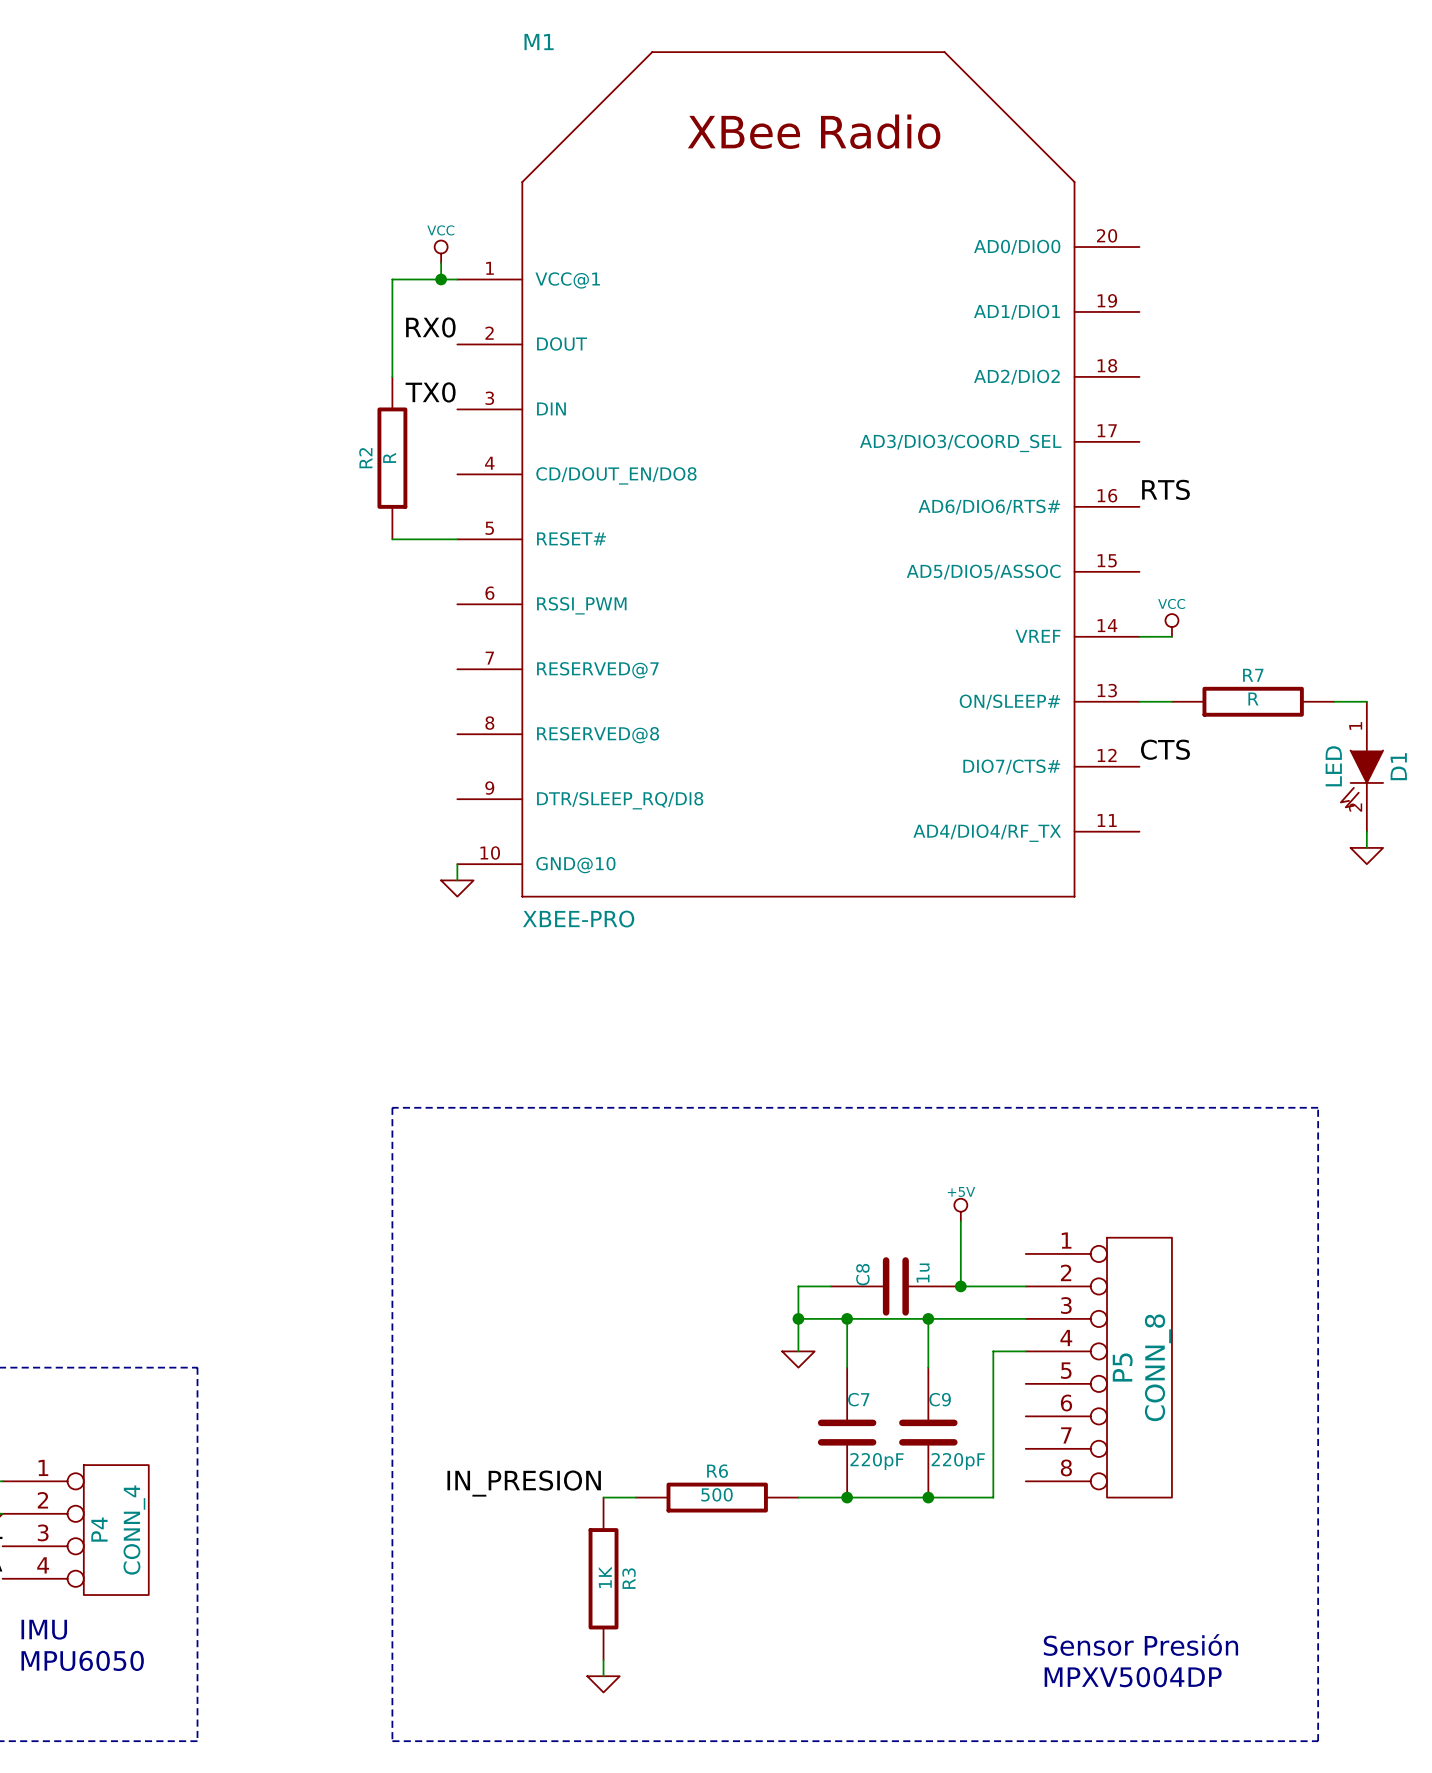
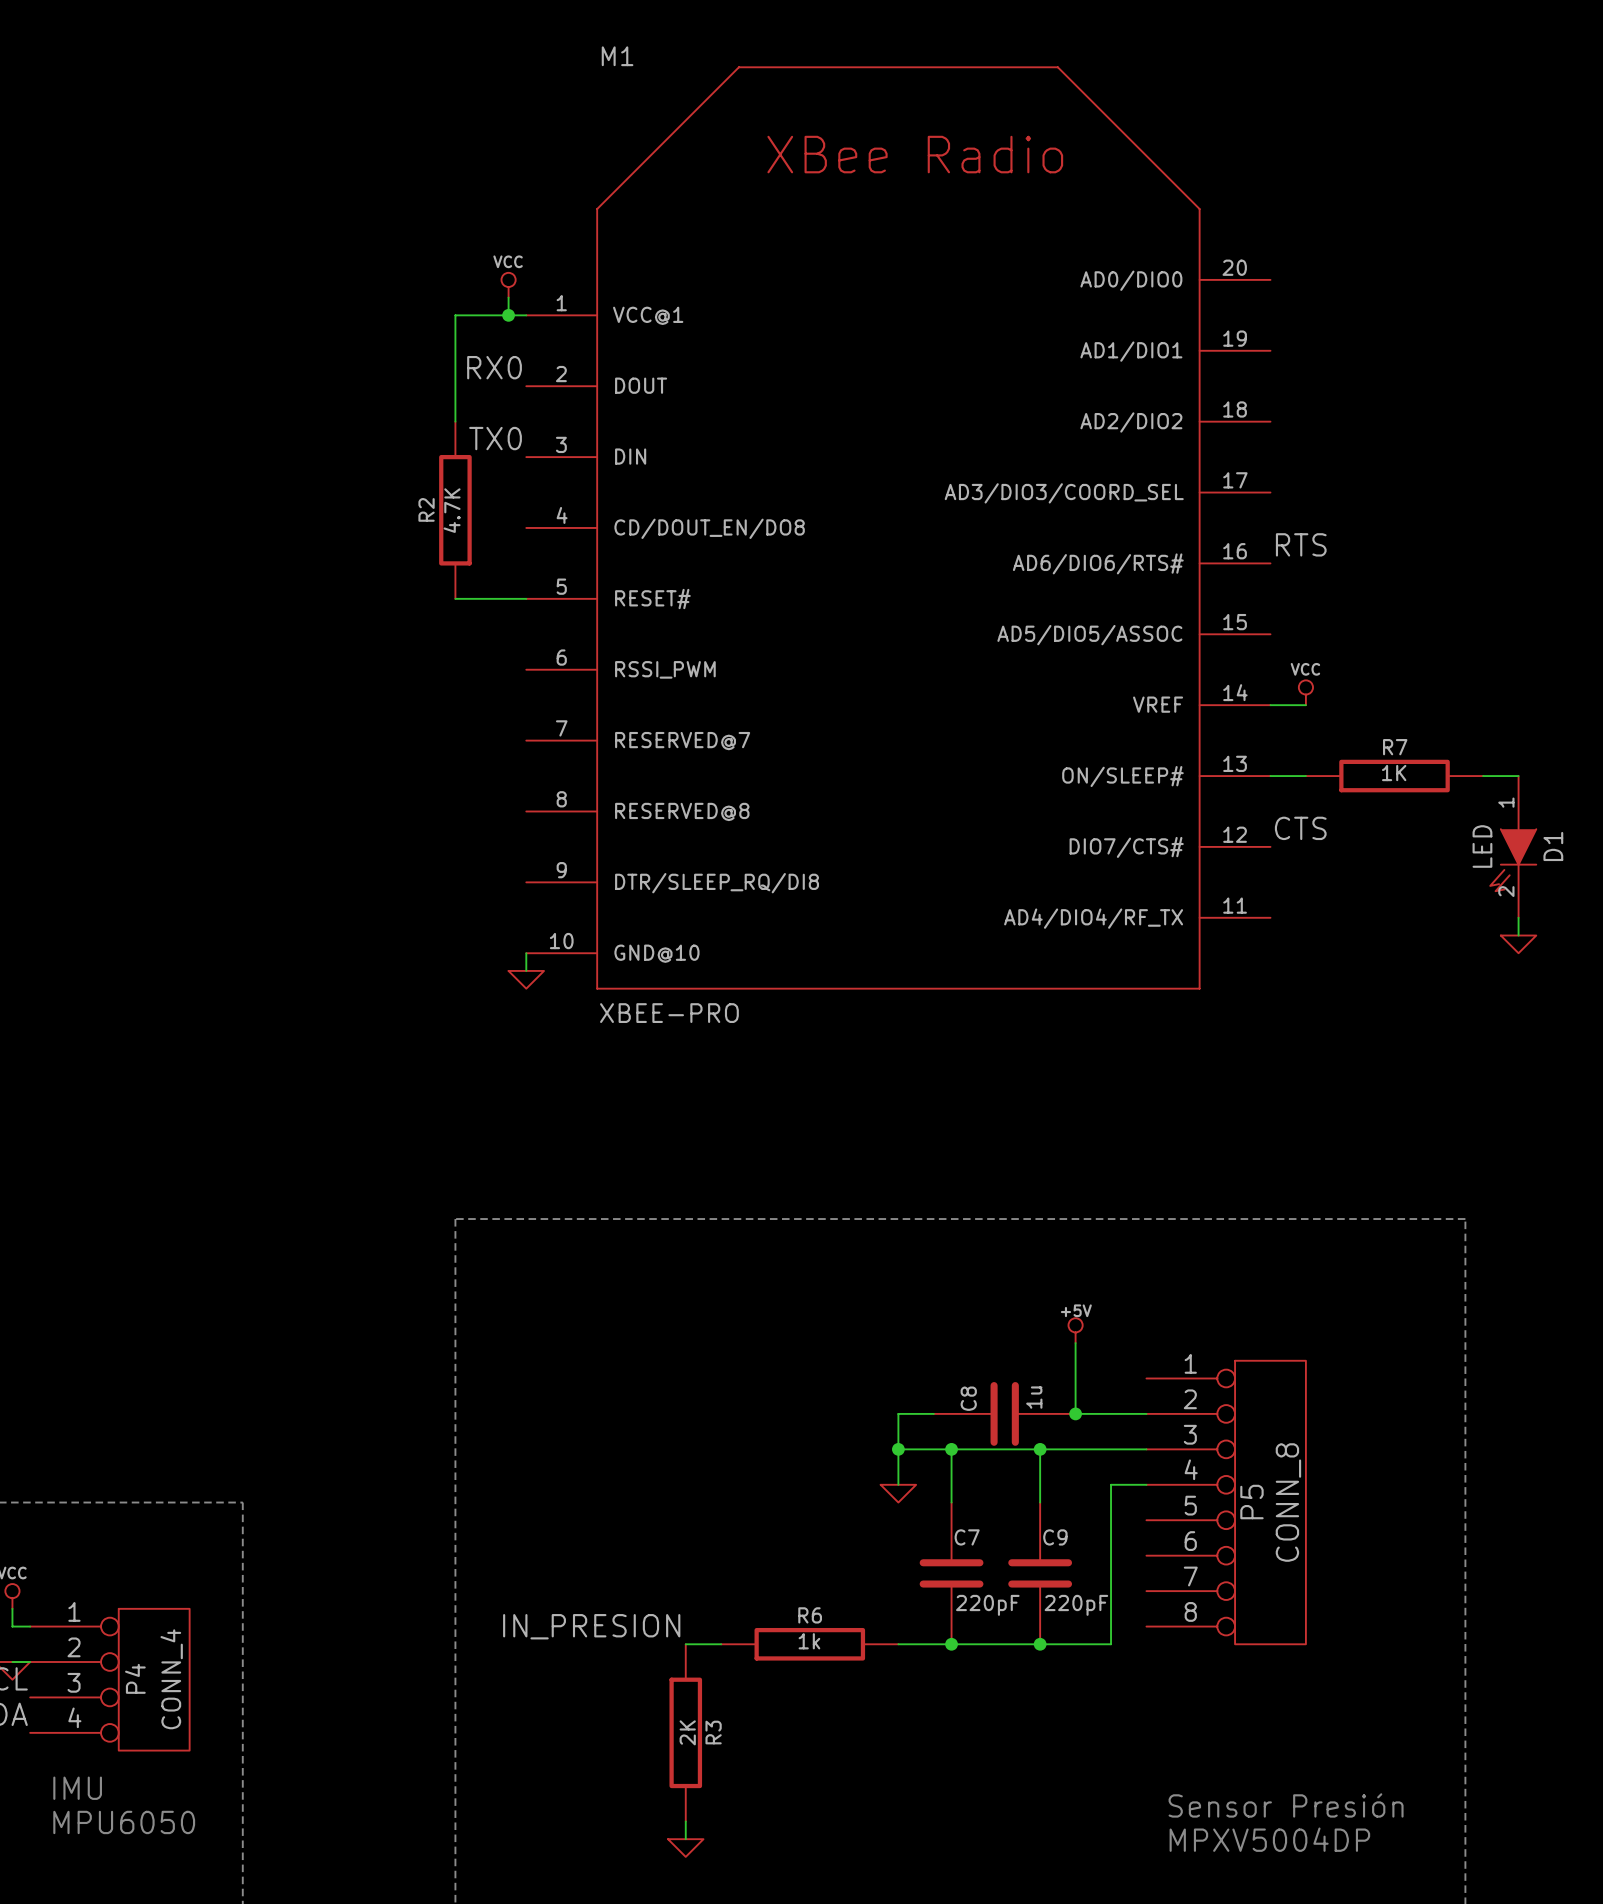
R2 value: R (389, 457) -> 4.7K (452, 510)
R7 value: R (1253, 699) -> 1K (1394, 773)
R6 value: 500 (716, 1494) -> 1k (809, 1641)
R3 value: 1K (605, 1577) -> 2K (687, 1732)

